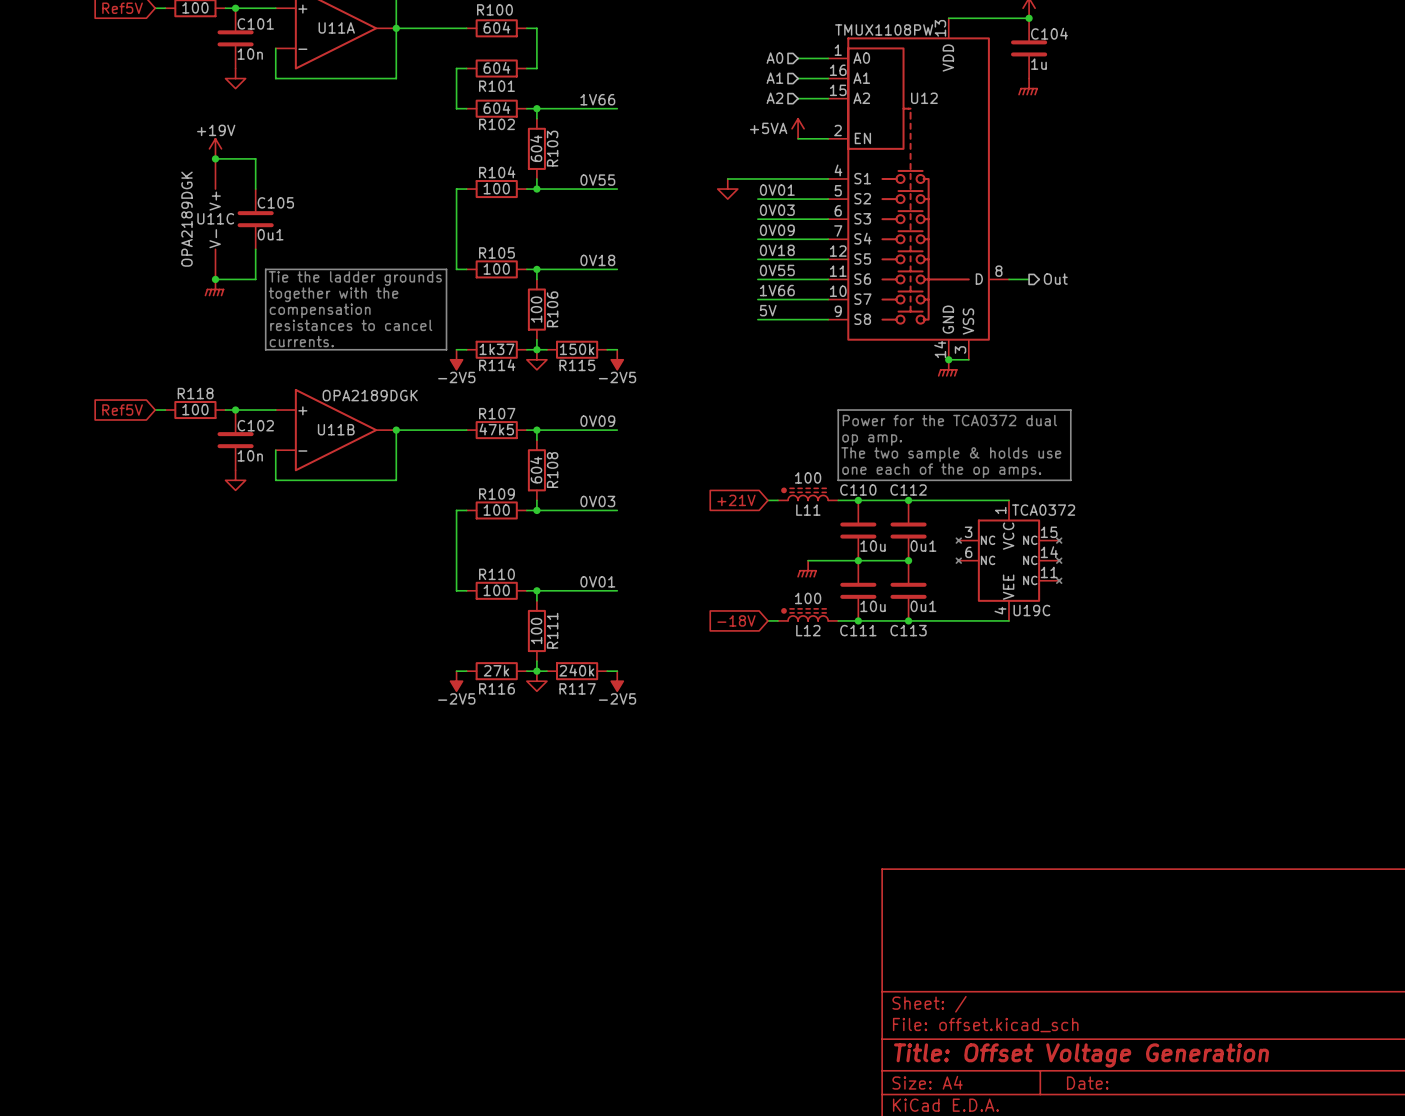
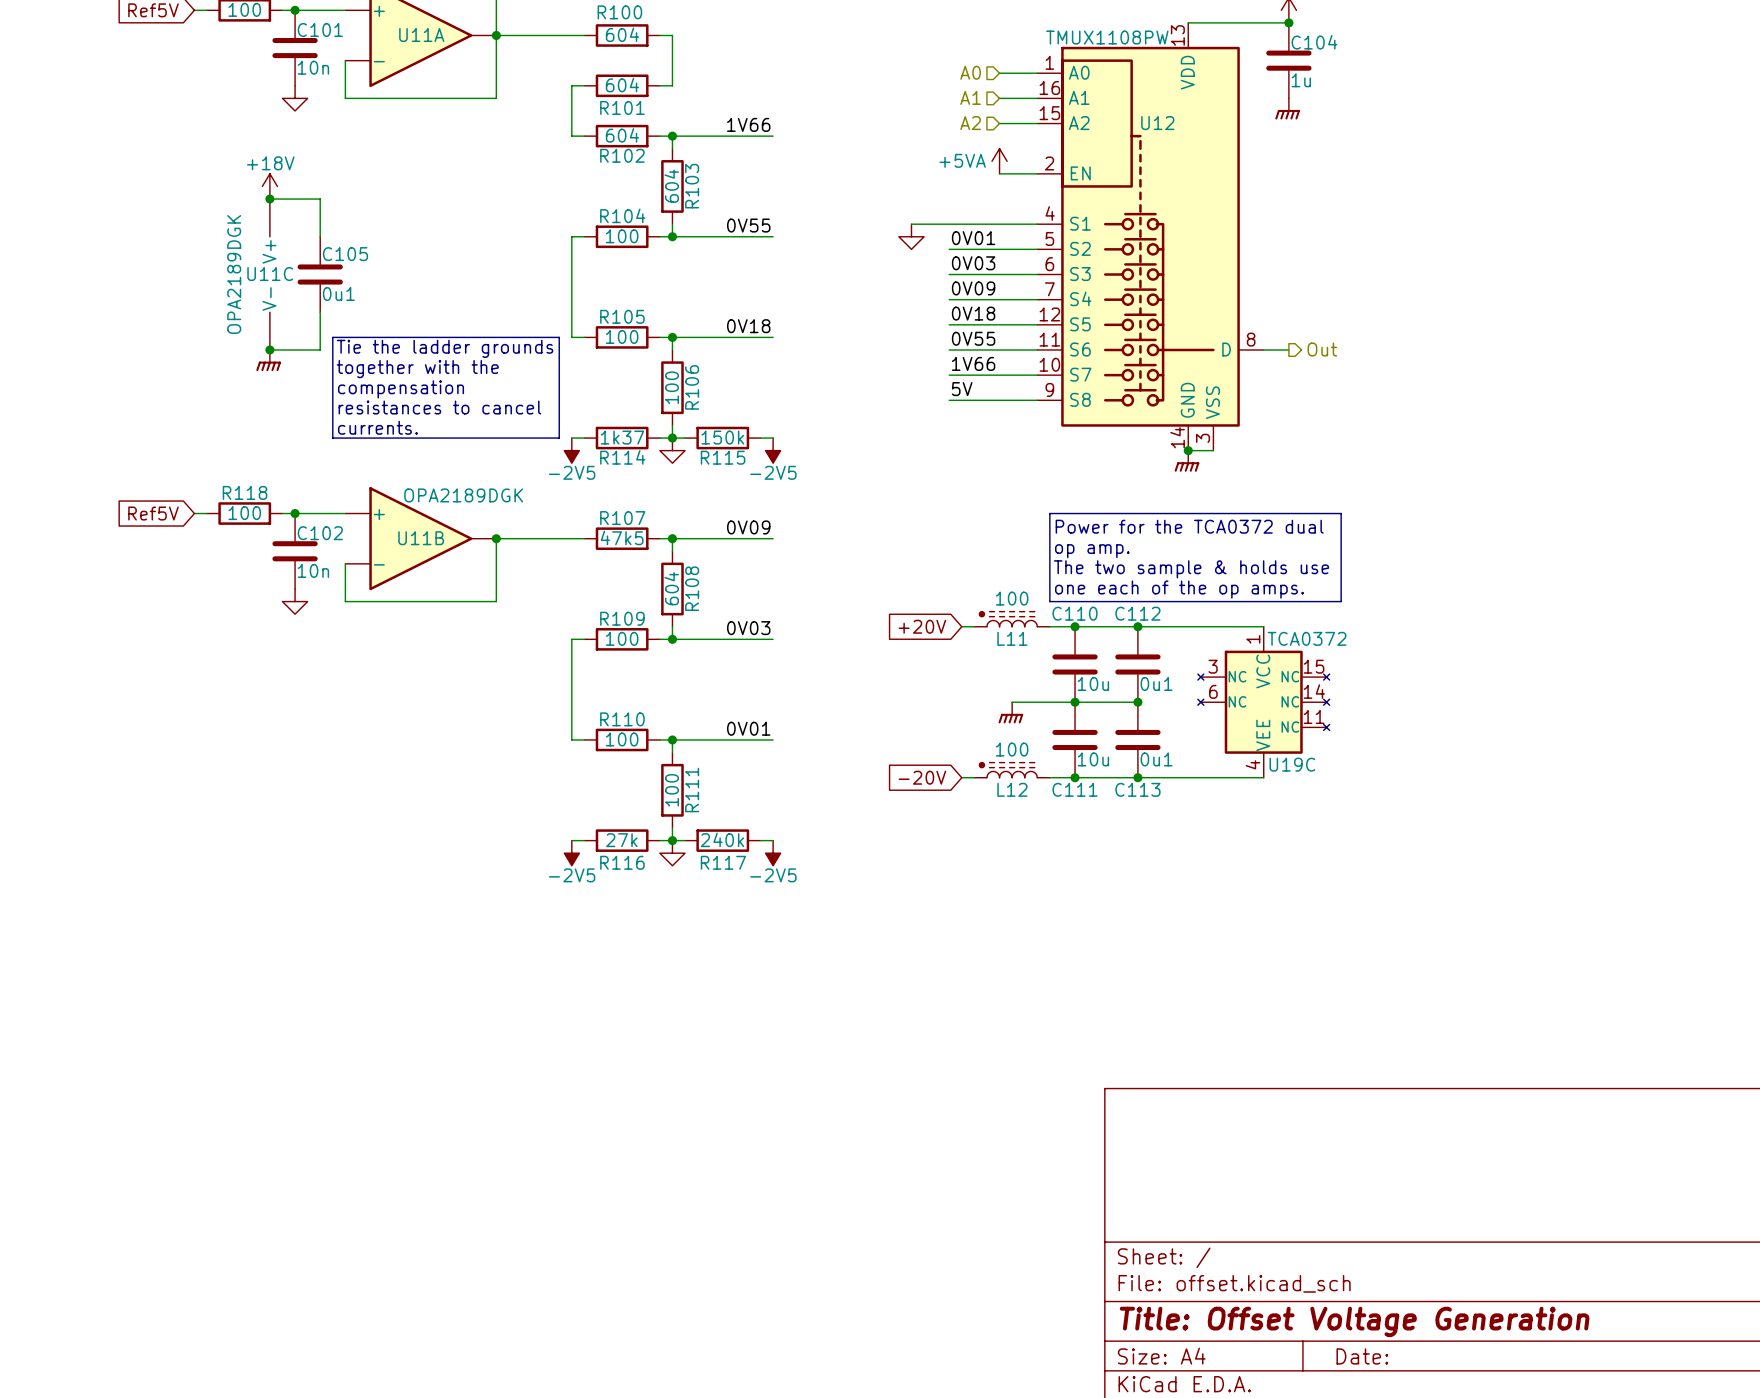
power symbol: +19V (215, 148) -> +18V (269, 186)
global label: +21V (736, 500) -> +20V (922, 626)
global label: -18V (736, 620) -> -20V (922, 777)

